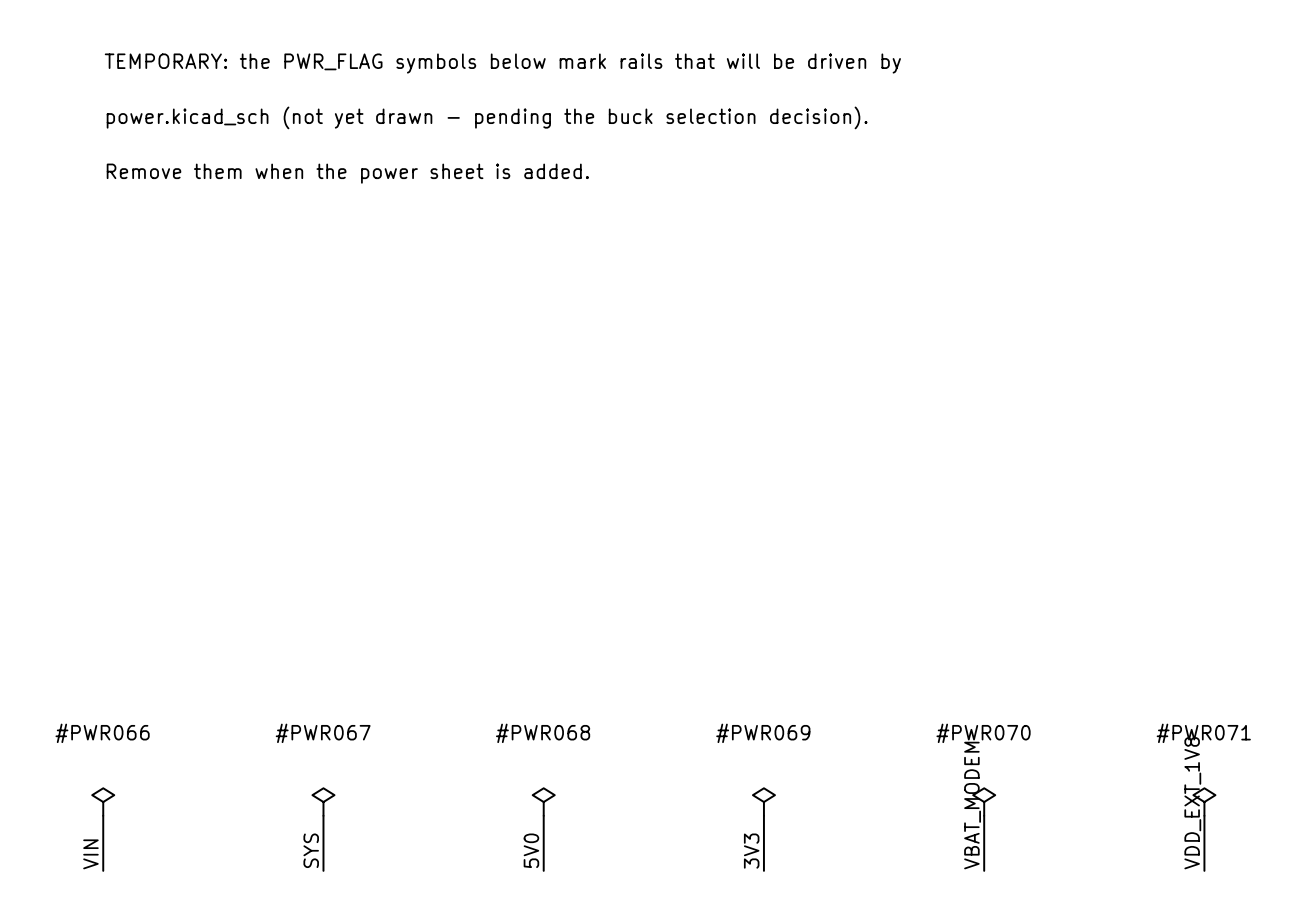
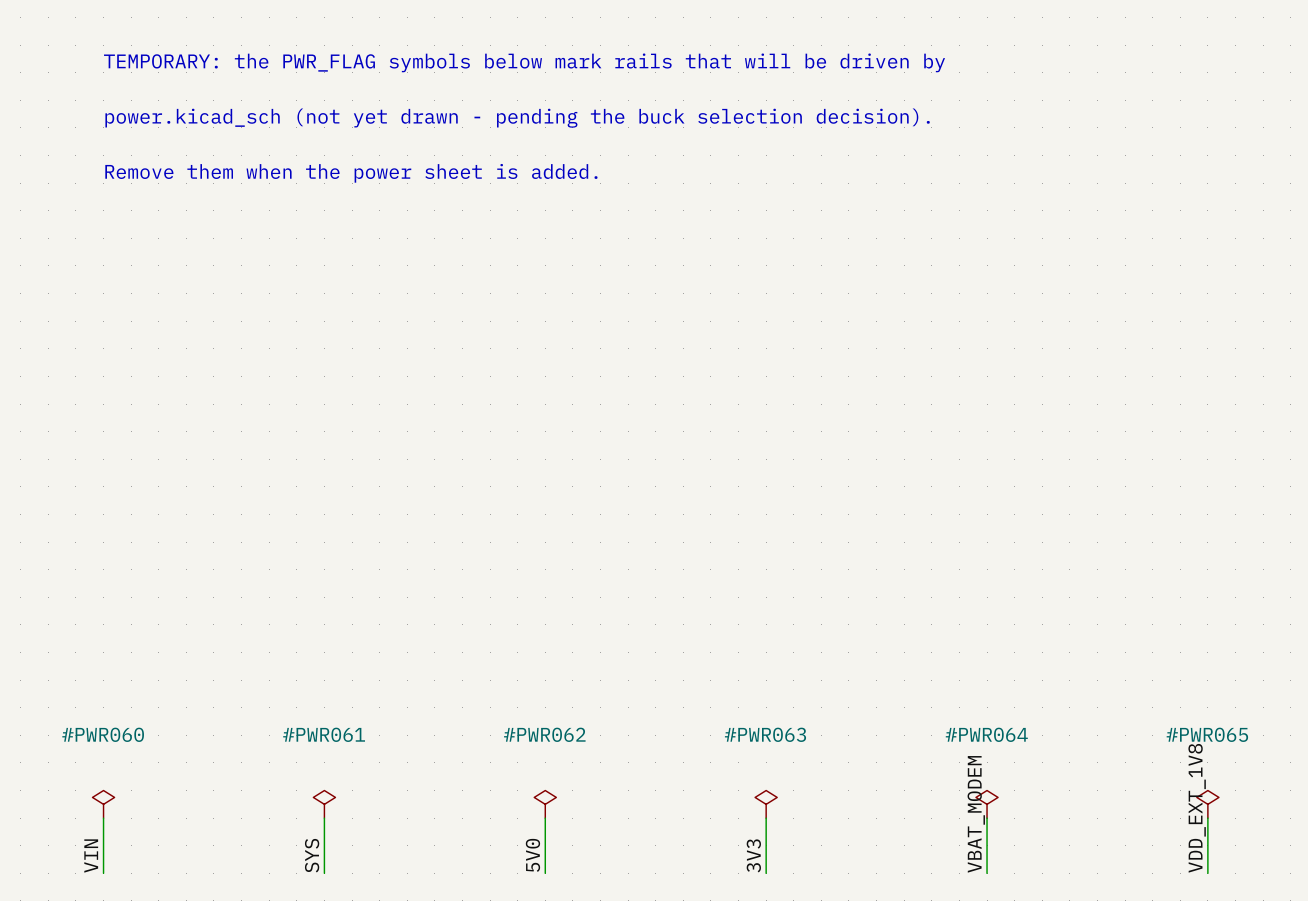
#PWR066 name: #PWR066 (102, 733) -> #PWR060 (103, 734)
#PWR067 name: #PWR067 (323, 733) -> #PWR061 (324, 734)
#PWR068 name: #PWR068 (543, 733) -> #PWR062 (544, 734)
#PWR069 name: #PWR069 (763, 733) -> #PWR063 (765, 734)
#PWR070 name: #PWR070 (983, 733) -> #PWR064 (986, 734)
#PWR071 name: #PWR071 (1203, 733) -> #PWR065 (1207, 734)

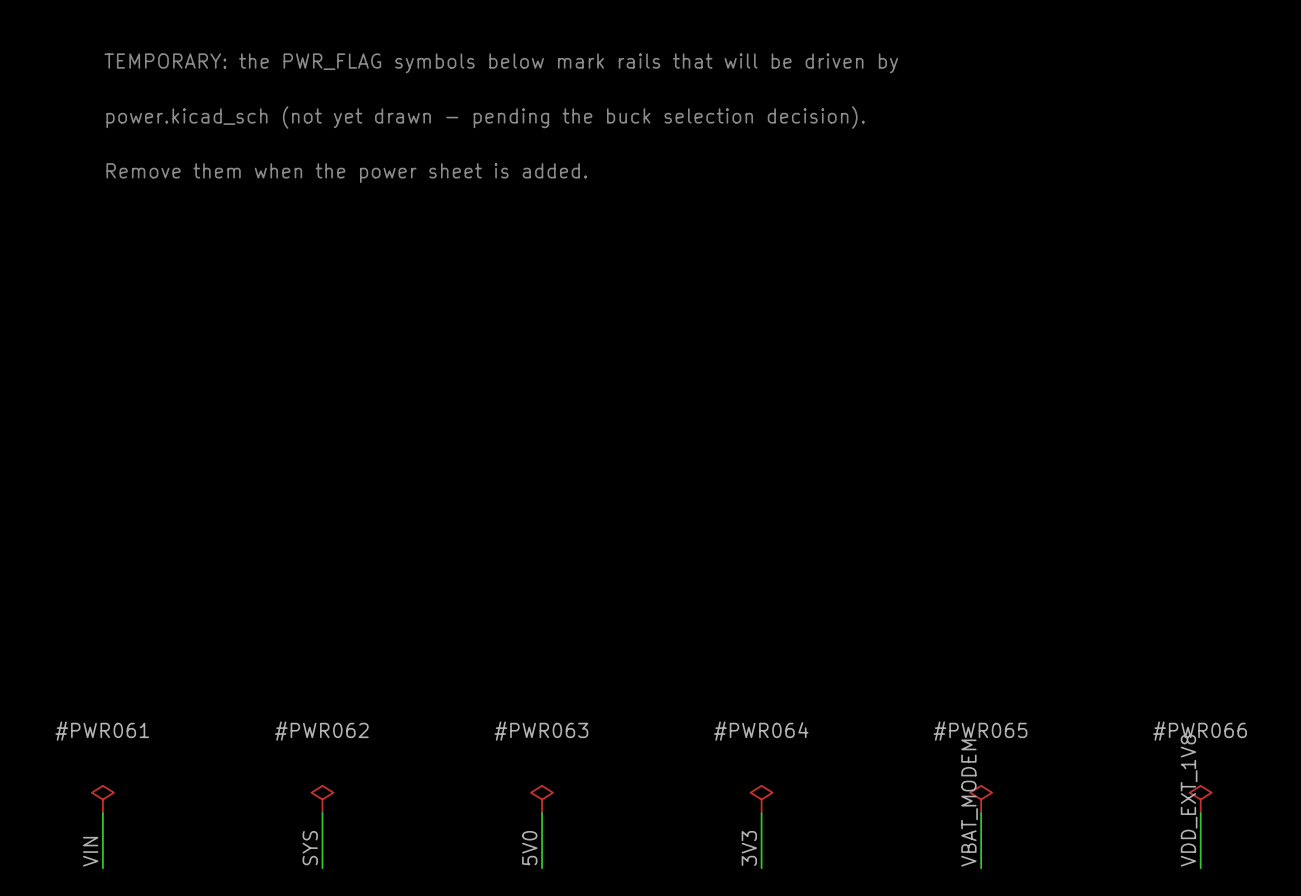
#PWR060 name: #PWR060 (103, 734) -> #PWR061 (102, 731)
#PWR061 name: #PWR061 (324, 734) -> #PWR062 (321, 731)
#PWR062 name: #PWR062 (544, 734) -> #PWR063 (541, 731)
#PWR063 name: #PWR063 (765, 734) -> #PWR064 (761, 731)
#PWR064 name: #PWR064 (986, 734) -> #PWR065 (980, 731)
#PWR065 name: #PWR065 (1207, 734) -> #PWR066 (1200, 731)

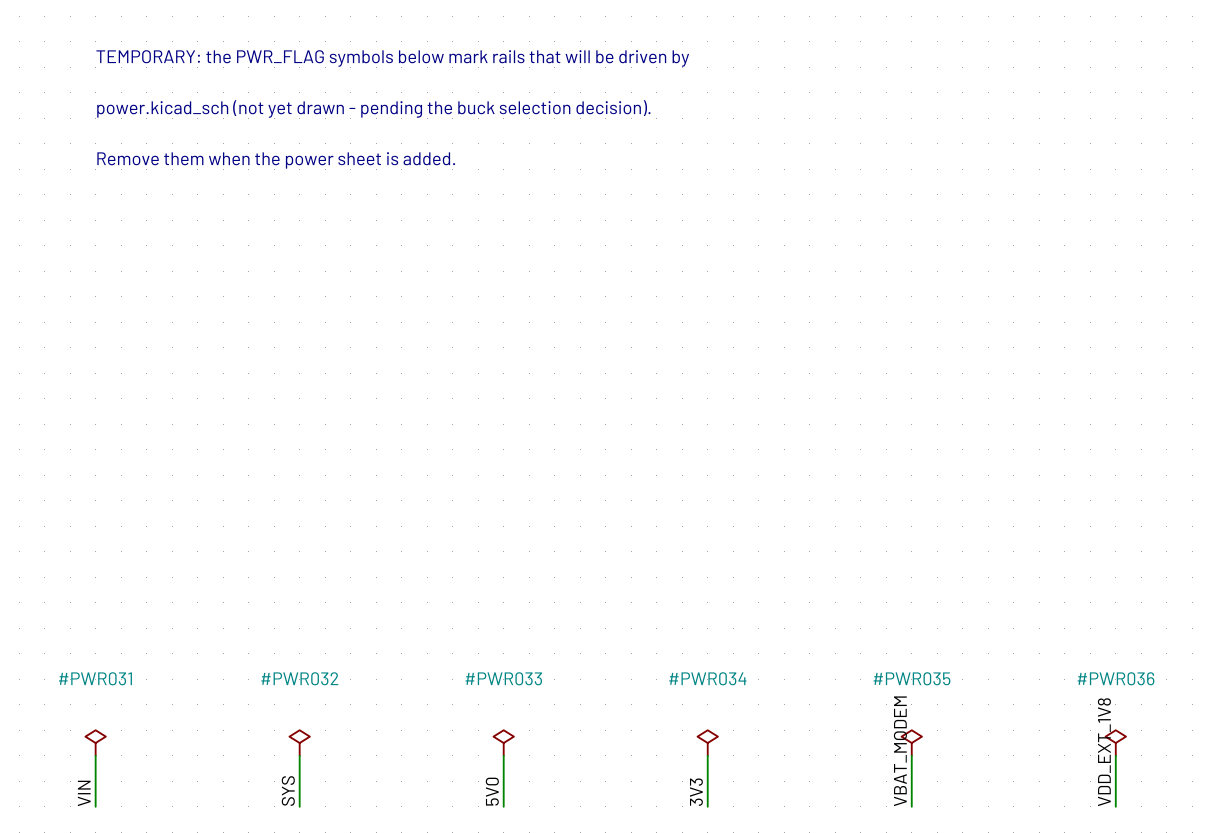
#PWR061 name: #PWR061 (102, 731) -> #PWR031 (95, 678)
#PWR062 name: #PWR062 (321, 731) -> #PWR032 (299, 678)
#PWR063 name: #PWR063 (541, 731) -> #PWR033 (503, 678)
#PWR064 name: #PWR064 (761, 731) -> #PWR034 (707, 678)
#PWR065 name: #PWR065 (980, 731) -> #PWR035 (911, 678)
#PWR066 name: #PWR066 (1200, 731) -> #PWR036 (1115, 678)

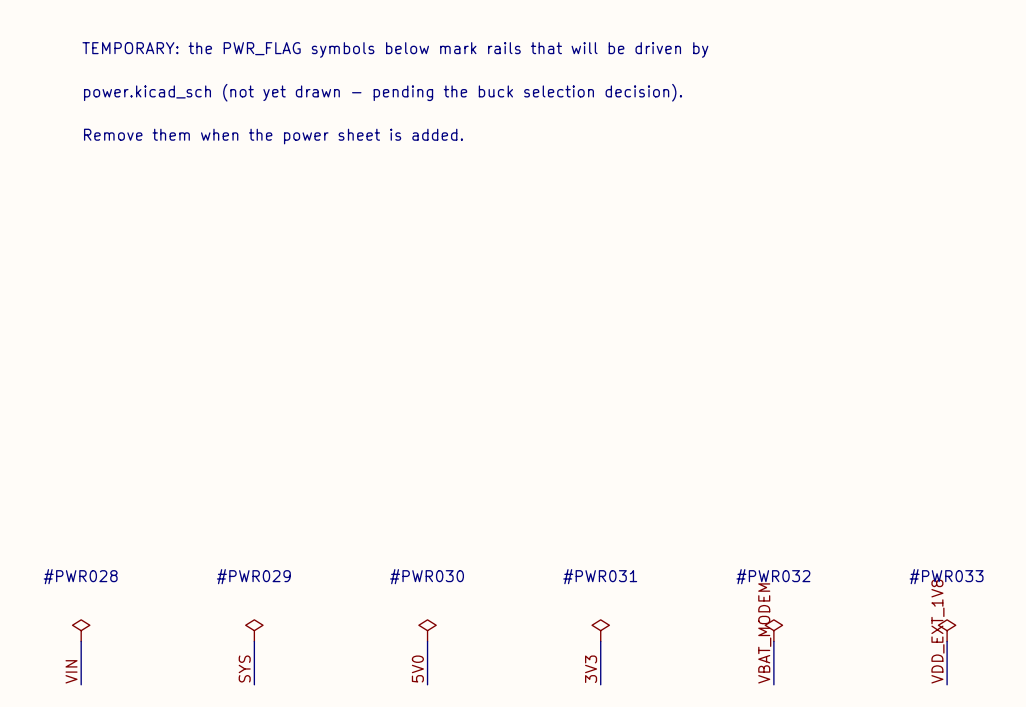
#PWR031 name: #PWR031 (95, 678) -> #PWR028 (80, 576)
#PWR032 name: #PWR032 (299, 678) -> #PWR029 (253, 576)
#PWR033 name: #PWR033 (503, 678) -> #PWR030 (427, 576)
#PWR034 name: #PWR034 (707, 678) -> #PWR031 (600, 576)
#PWR035 name: #PWR035 (911, 678) -> #PWR032 (773, 576)
#PWR036 name: #PWR036 (1115, 678) -> #PWR033 (946, 576)

